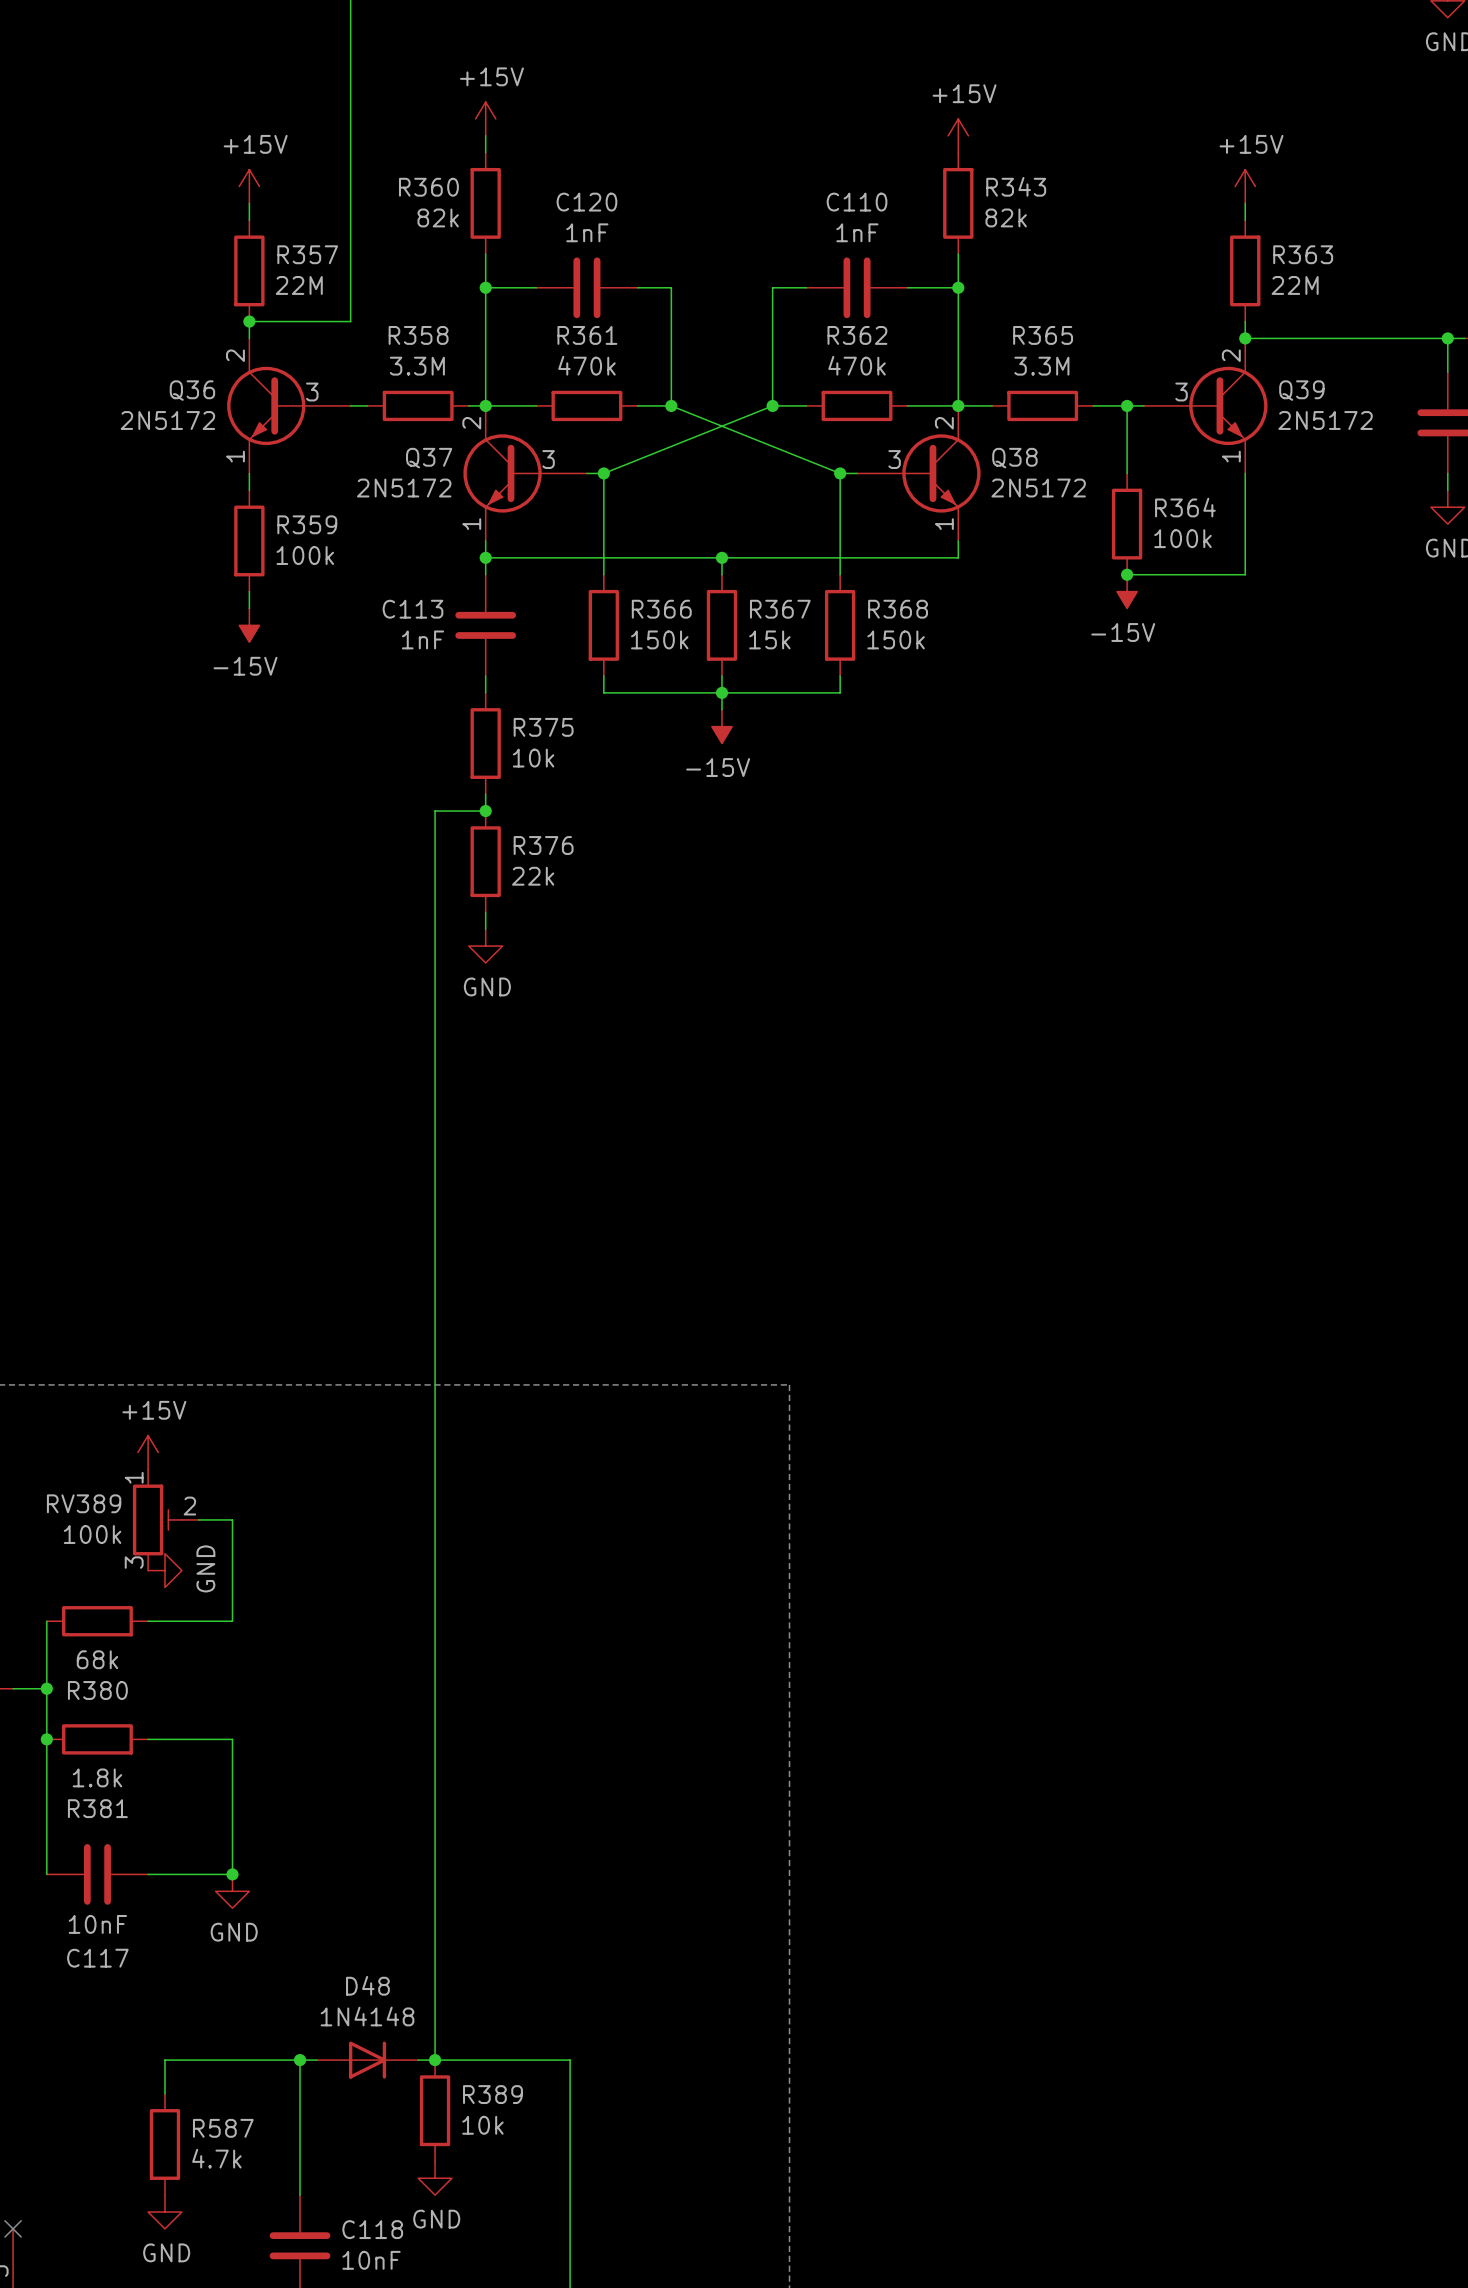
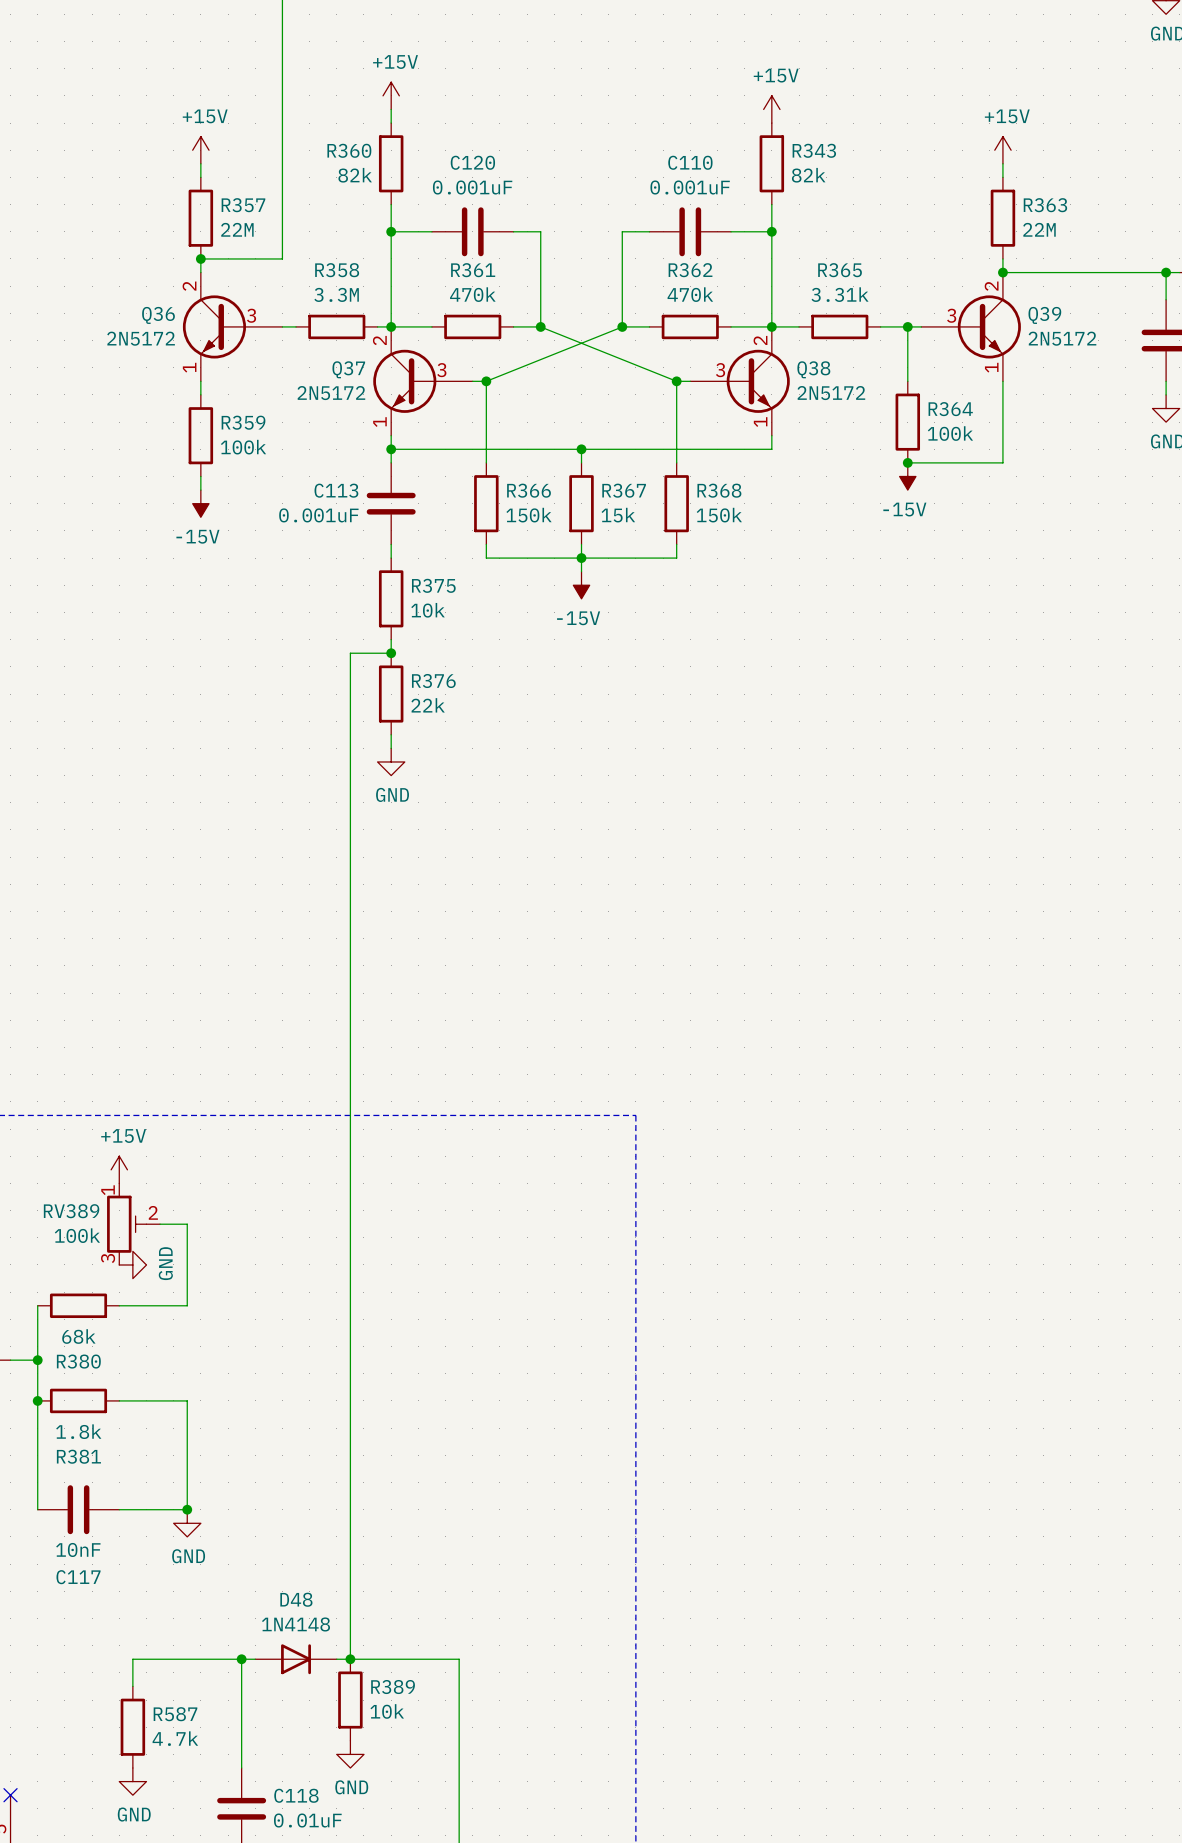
C120 value: 1nF (587, 232) -> 0.001uF (472, 187)
C110 value: 1nF (857, 232) -> 0.001uF (690, 187)
R365 value: 3.3M (1041, 366) -> 3.31k (840, 294)
C113 value: 1nF (423, 639) -> 0.001uF (318, 515)
C118 value: 10nF (371, 2260) -> 0.01uF (307, 1820)

